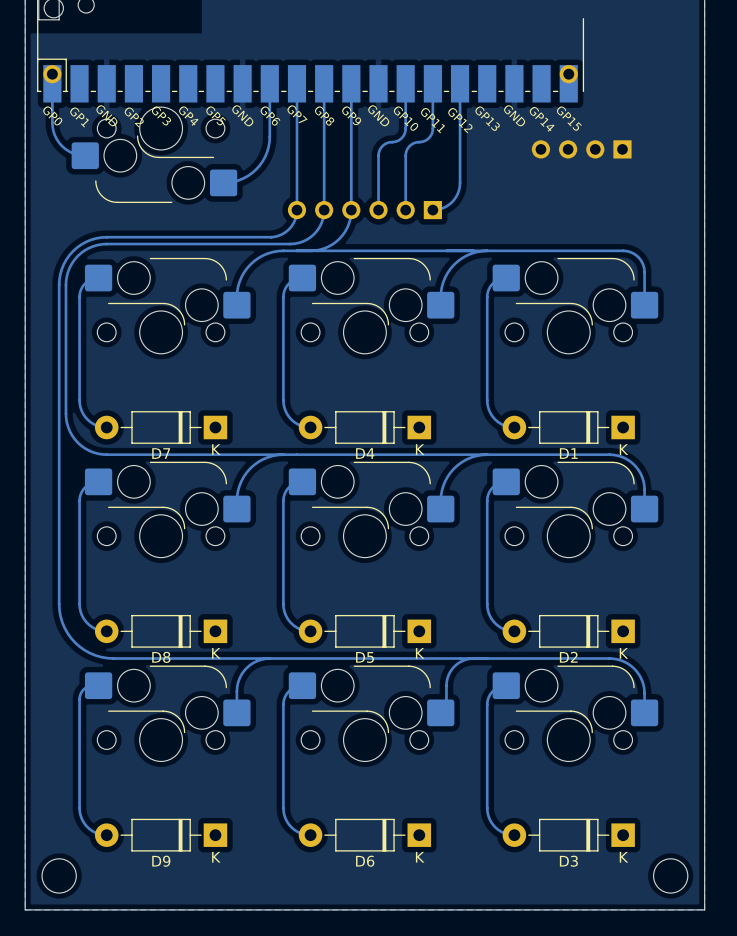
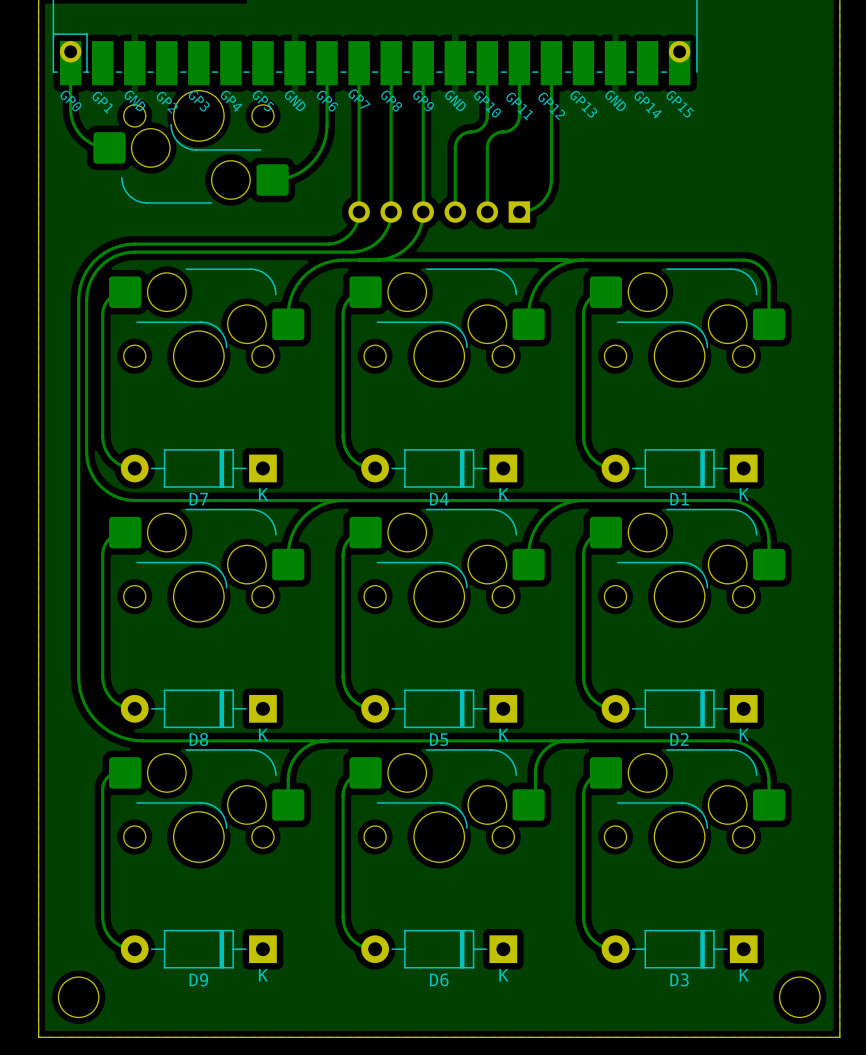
part: (581, 149) -> none

